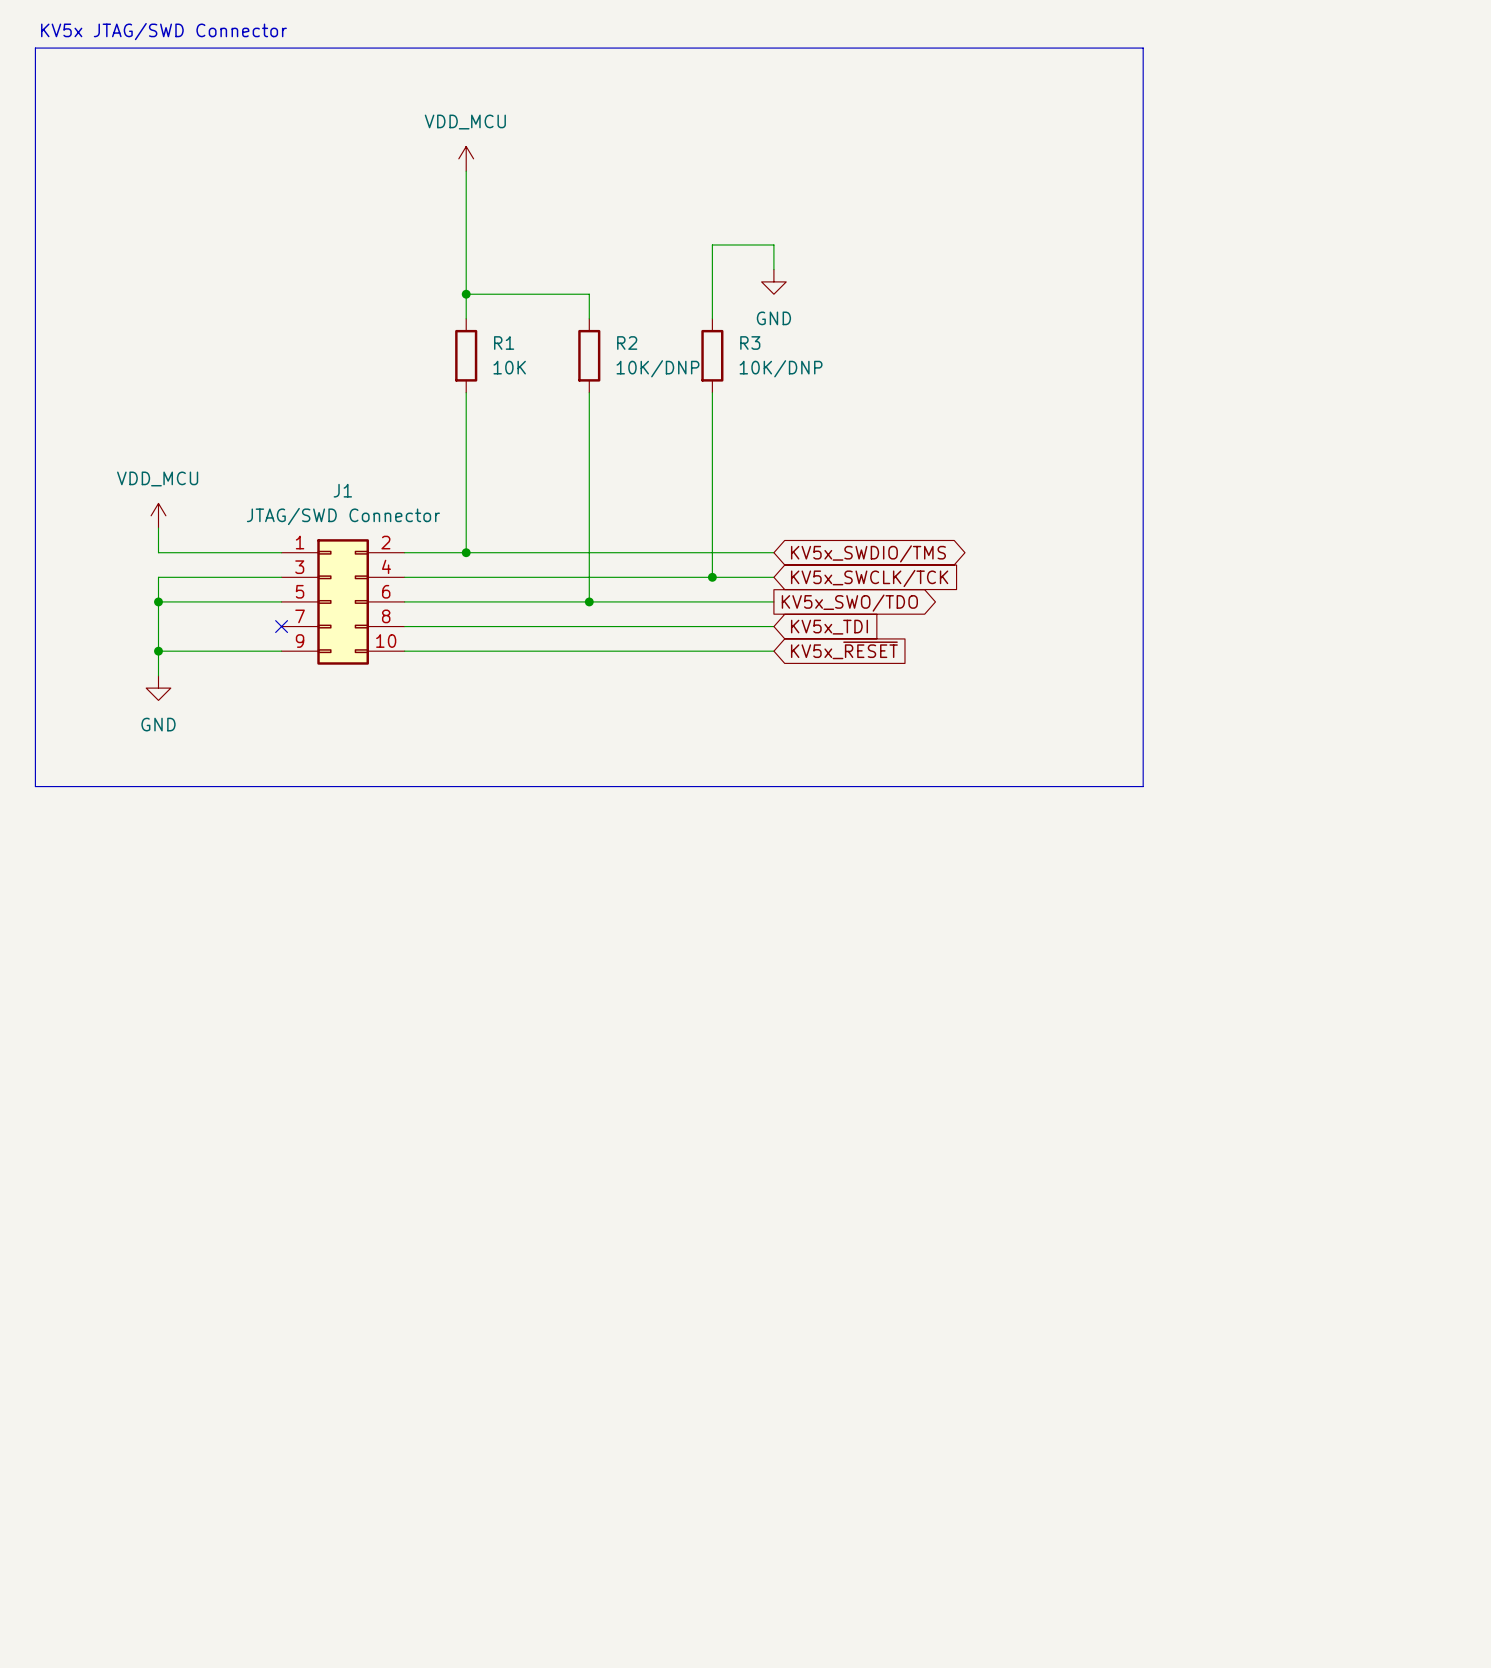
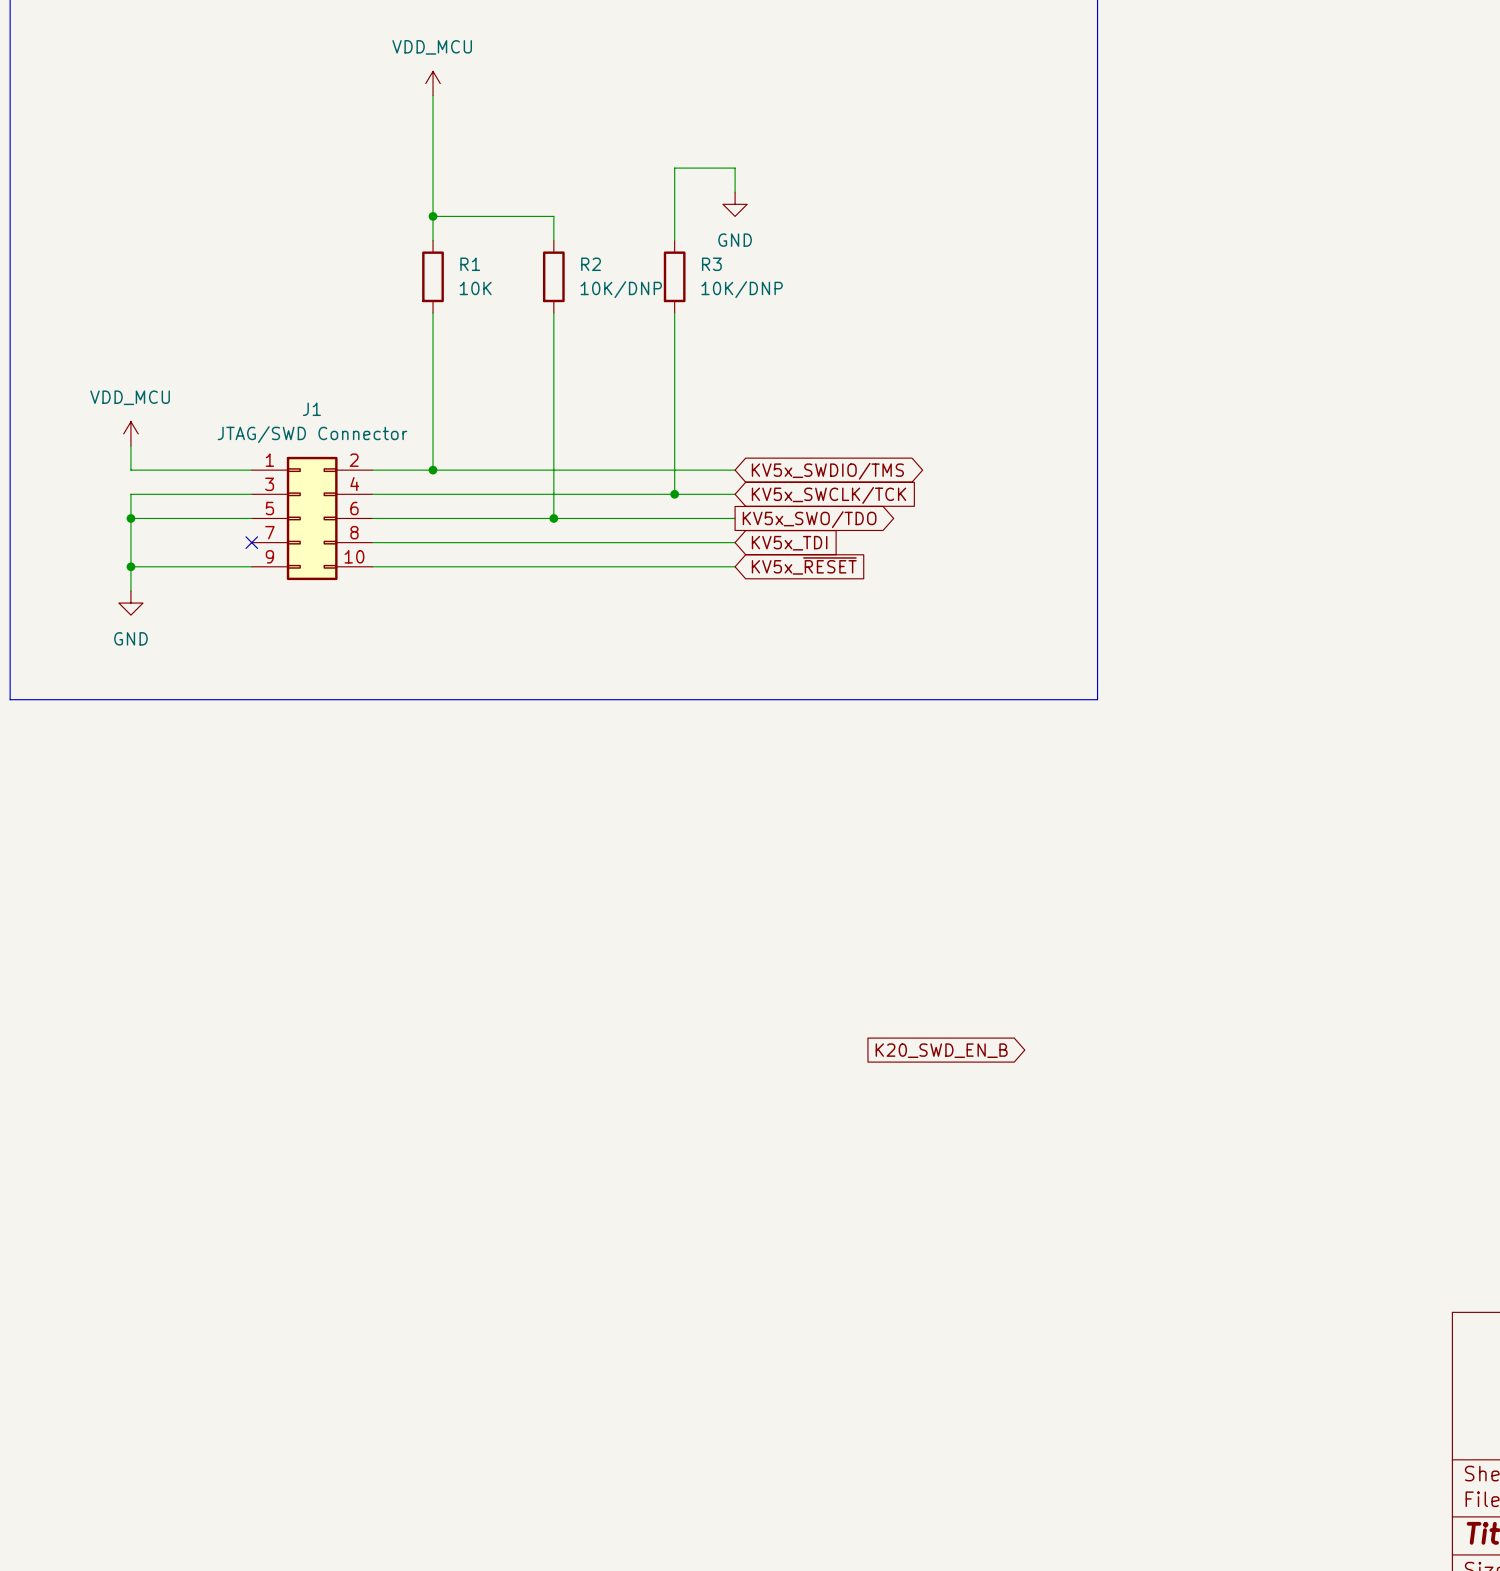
global label: none -> K20_SWD_EN_B (941, 1050)

